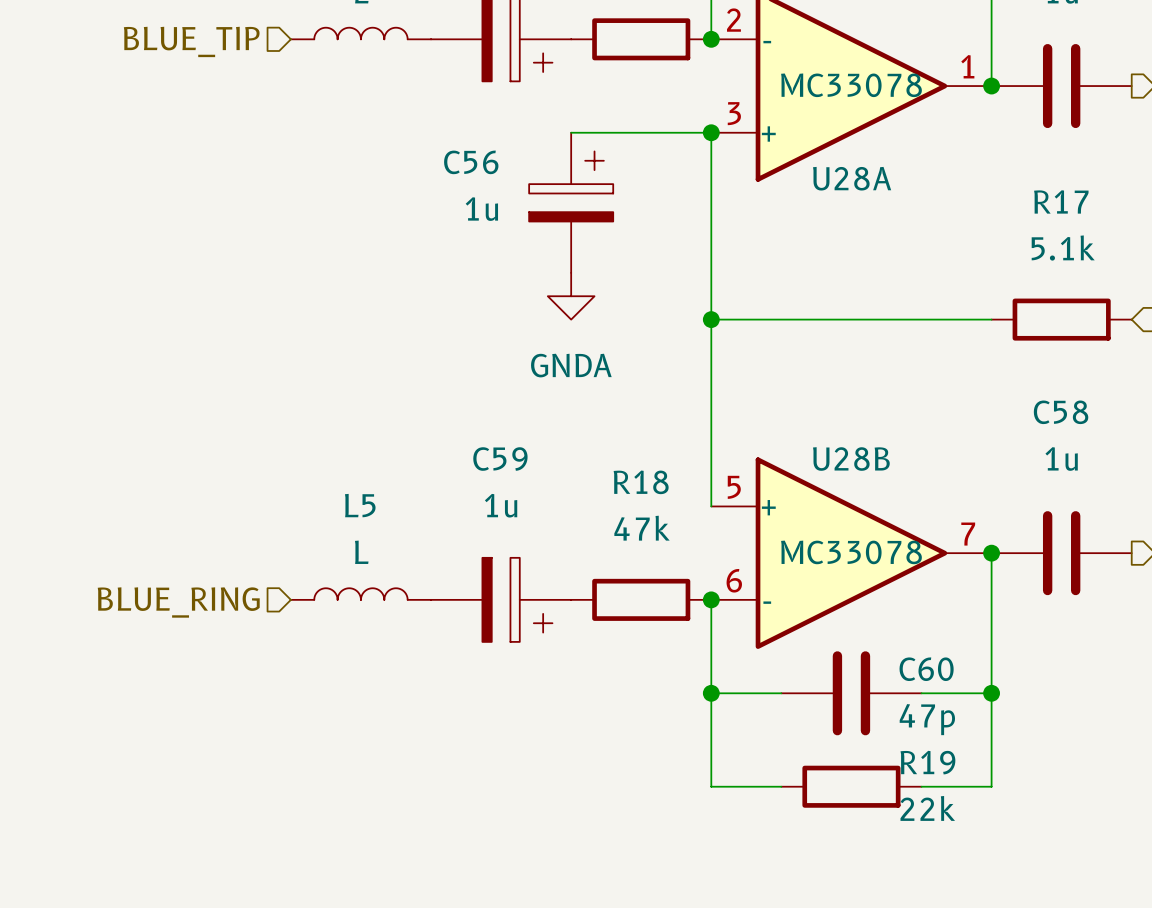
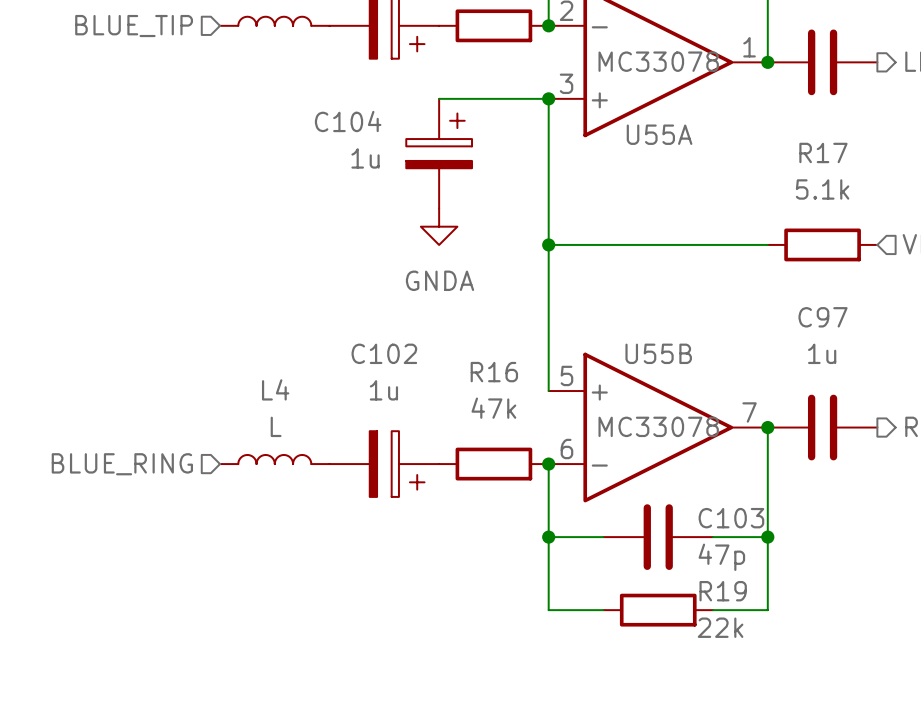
C56 name: C56 (471, 162) -> C104 (348, 121)
U28A name: U28A (852, 178) -> U55A (659, 134)
C58 name: C58 (1061, 412) -> C97 (823, 317)
U28B name: U28B (851, 458) -> U55B (658, 353)
C59 name: C59 (500, 459) -> C102 (384, 353)
R18 name: R18 (641, 482) -> R16 (494, 372)
L5 name: L5 (360, 505) -> L4 (275, 389)
C60 name: C60 (926, 669) -> C103 (731, 518)

